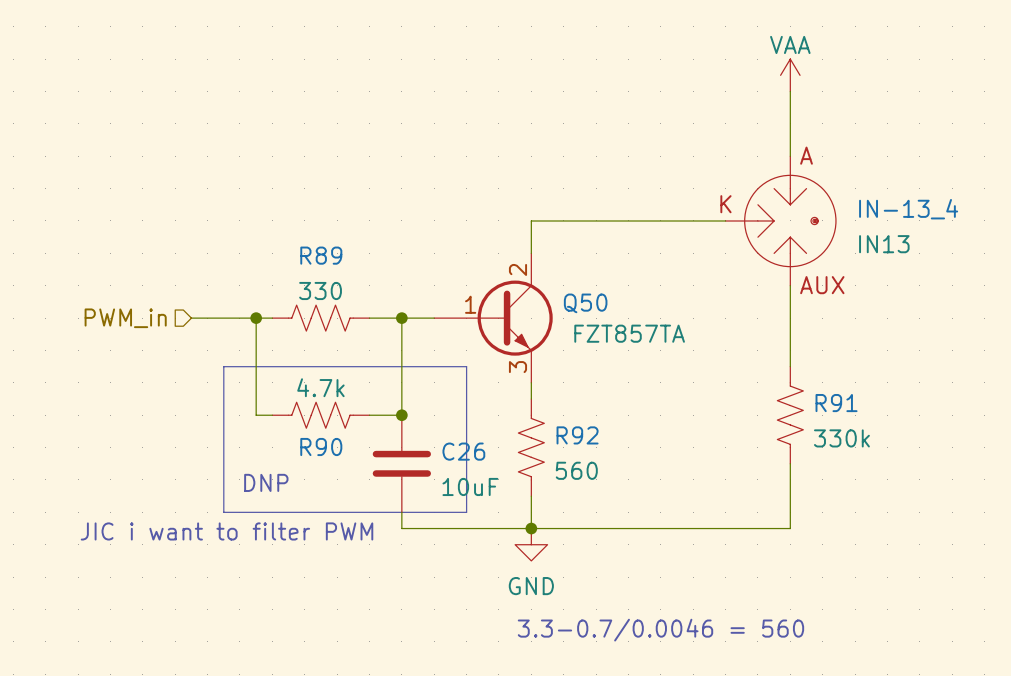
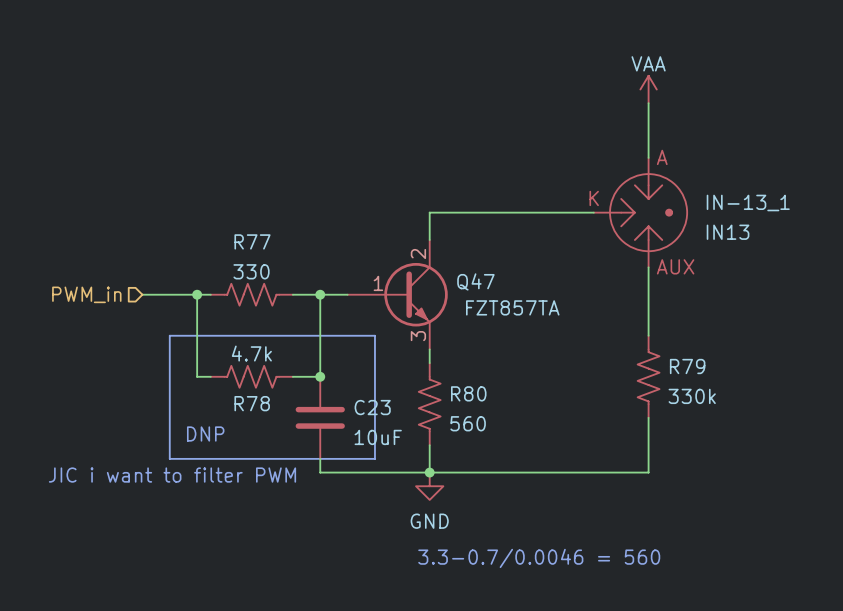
IN-13_4 name: IN-13_4 (908, 209) -> IN-13_1 (748, 202)
R89 name: R89 (321, 255) -> R77 (252, 241)
Q50 name: Q50 (585, 303) -> Q47 (475, 281)
R91 name: R91 (836, 403) -> R79 (687, 366)
R92 name: R92 (577, 435) -> R80 (468, 393)
R90 name: R90 (321, 447) -> R78 (252, 403)
C26 name: C26 (463, 451) -> C23 (372, 407)

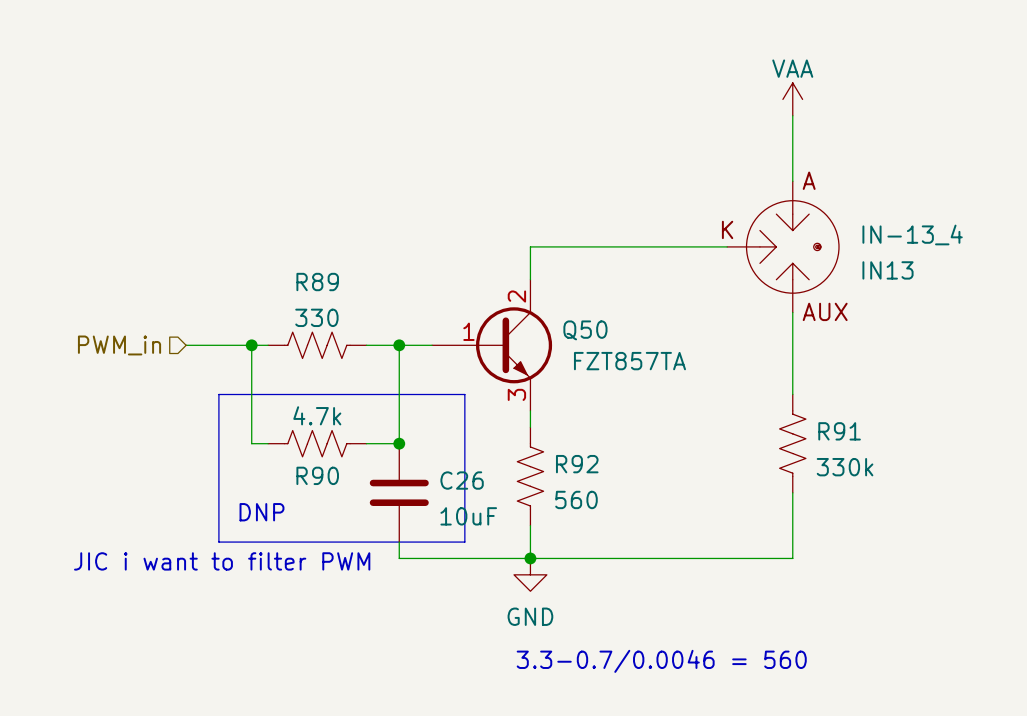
IN-13_1 name: IN-13_1 (748, 202) -> IN-13_4 (912, 234)
R77 name: R77 (252, 241) -> R89 (317, 282)
Q47 name: Q47 (475, 281) -> Q50 (585, 330)
R79 name: R79 (687, 366) -> R91 (839, 431)
R80 name: R80 (468, 393) -> R92 (577, 464)
R78 name: R78 (252, 403) -> R90 (317, 475)
C23 name: C23 (372, 407) -> C26 (462, 480)

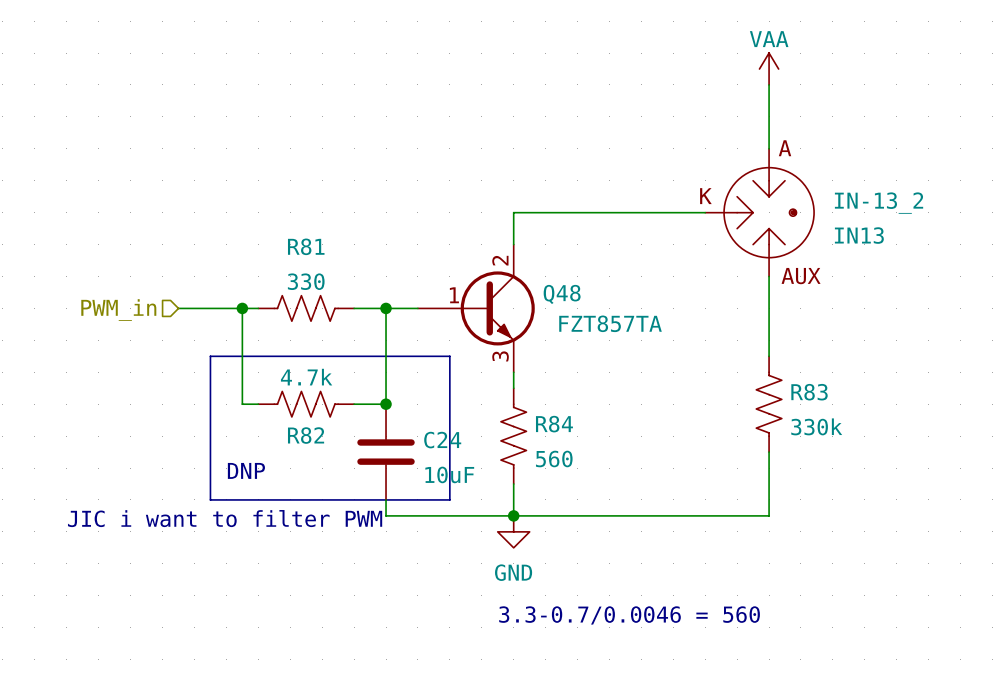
IN-13_4 name: IN-13_4 (912, 234) -> IN-13_2 (879, 203)
R89 name: R89 (317, 282) -> R81 (306, 246)
Q50 name: Q50 (585, 330) -> Q48 (562, 294)
R91 name: R91 (839, 431) -> R83 (809, 392)
R92 name: R92 (577, 464) -> R84 (554, 424)
R90 name: R90 (317, 475) -> R82 (306, 435)
C26 name: C26 (462, 480) -> C24 (442, 440)

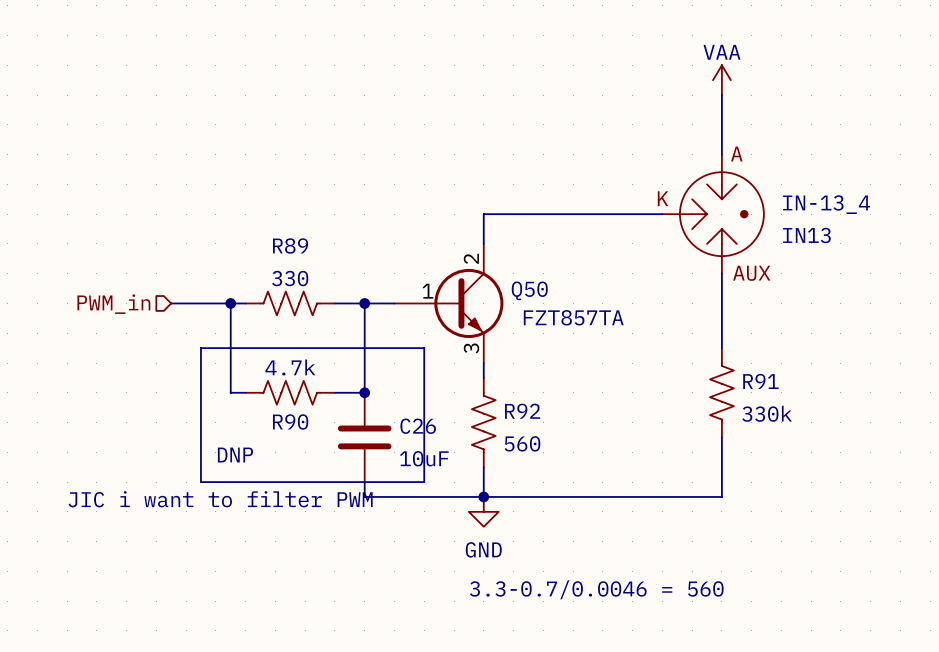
IN-13_2 name: IN-13_2 (879, 203) -> IN-13_4 (826, 204)
R81 name: R81 (306, 246) -> R89 (290, 246)
Q48 name: Q48 (562, 294) -> Q50 (529, 290)
R83 name: R83 (809, 392) -> R91 (760, 381)
R84 name: R84 (554, 424) -> R92 (522, 411)
R82 name: R82 (306, 435) -> R90 (290, 421)
C24 name: C24 (442, 440) -> C26 (418, 426)

